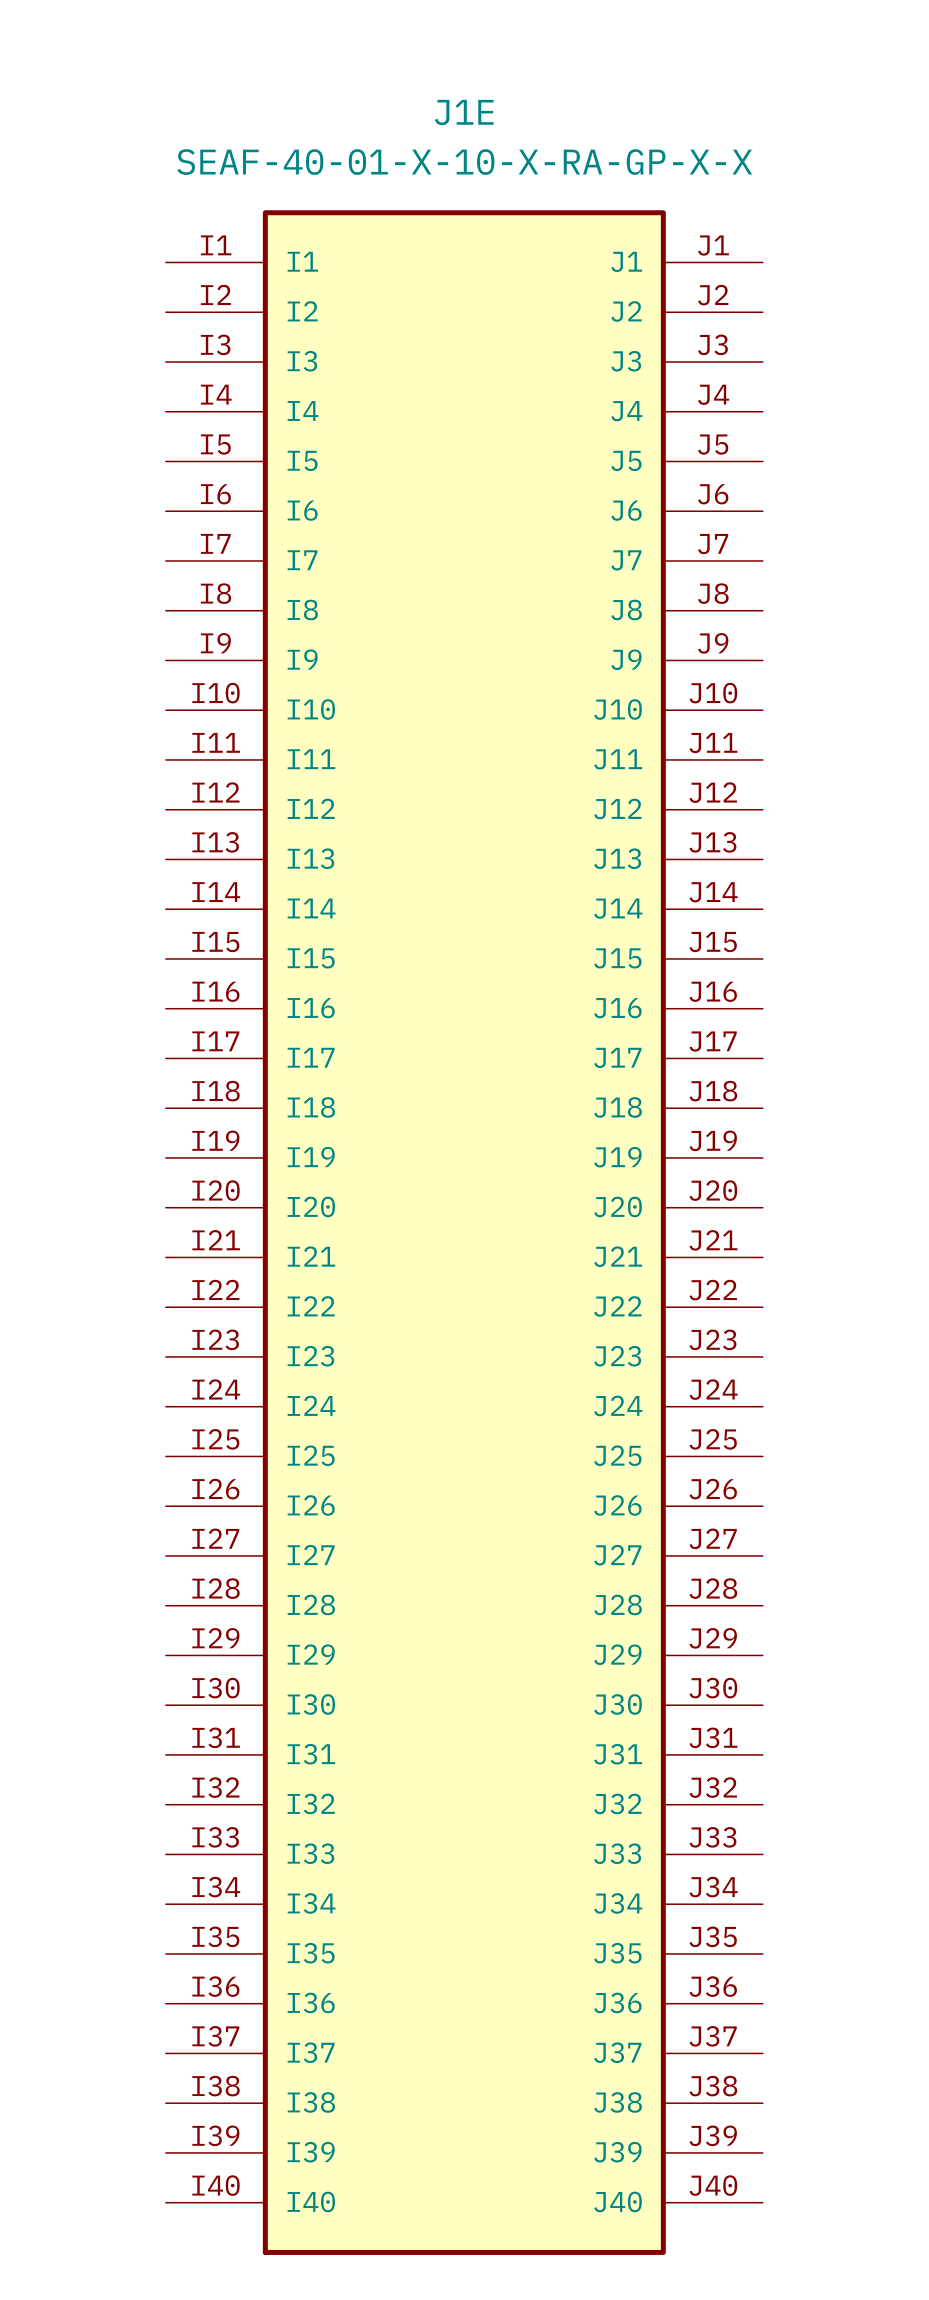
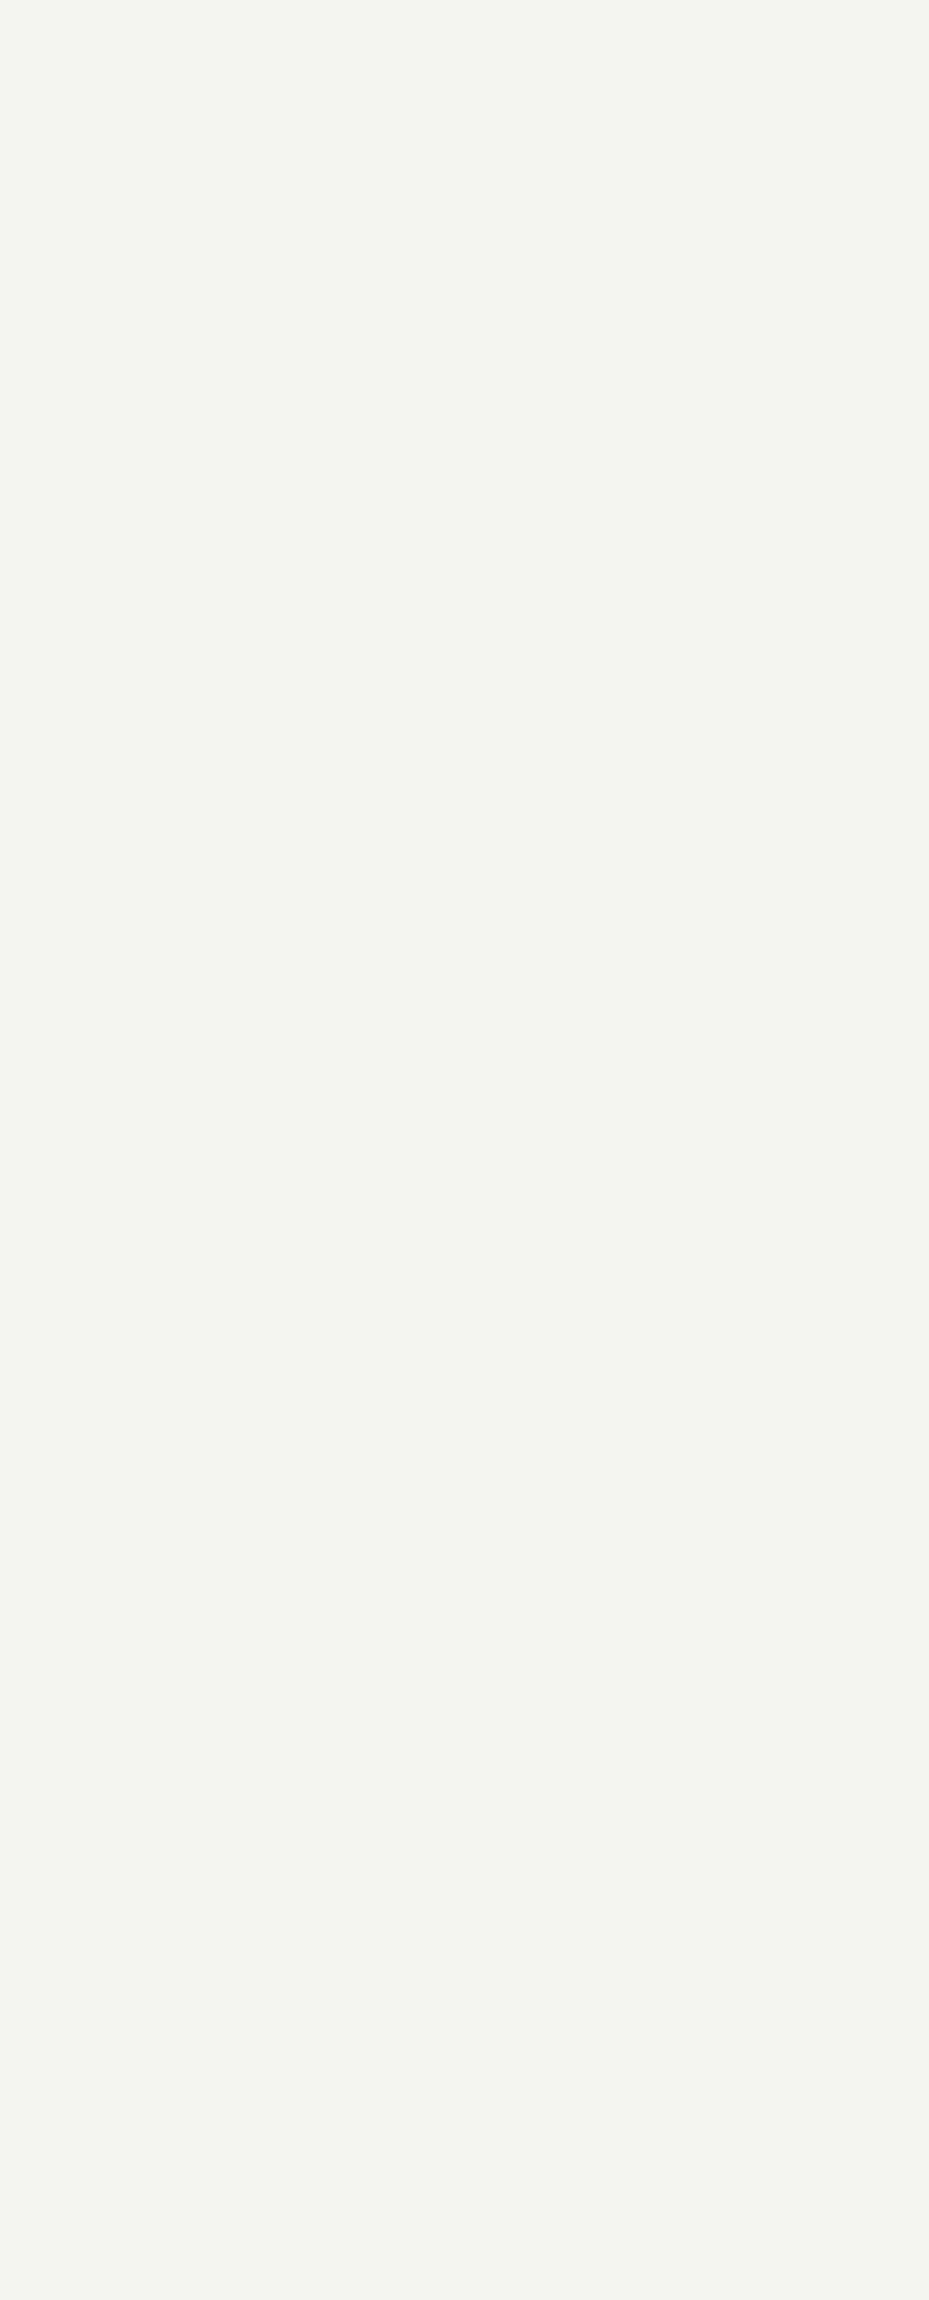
J1E: SEAF-40-01-X-10-X-RA-GP-X-X (464, 1232) -> none

